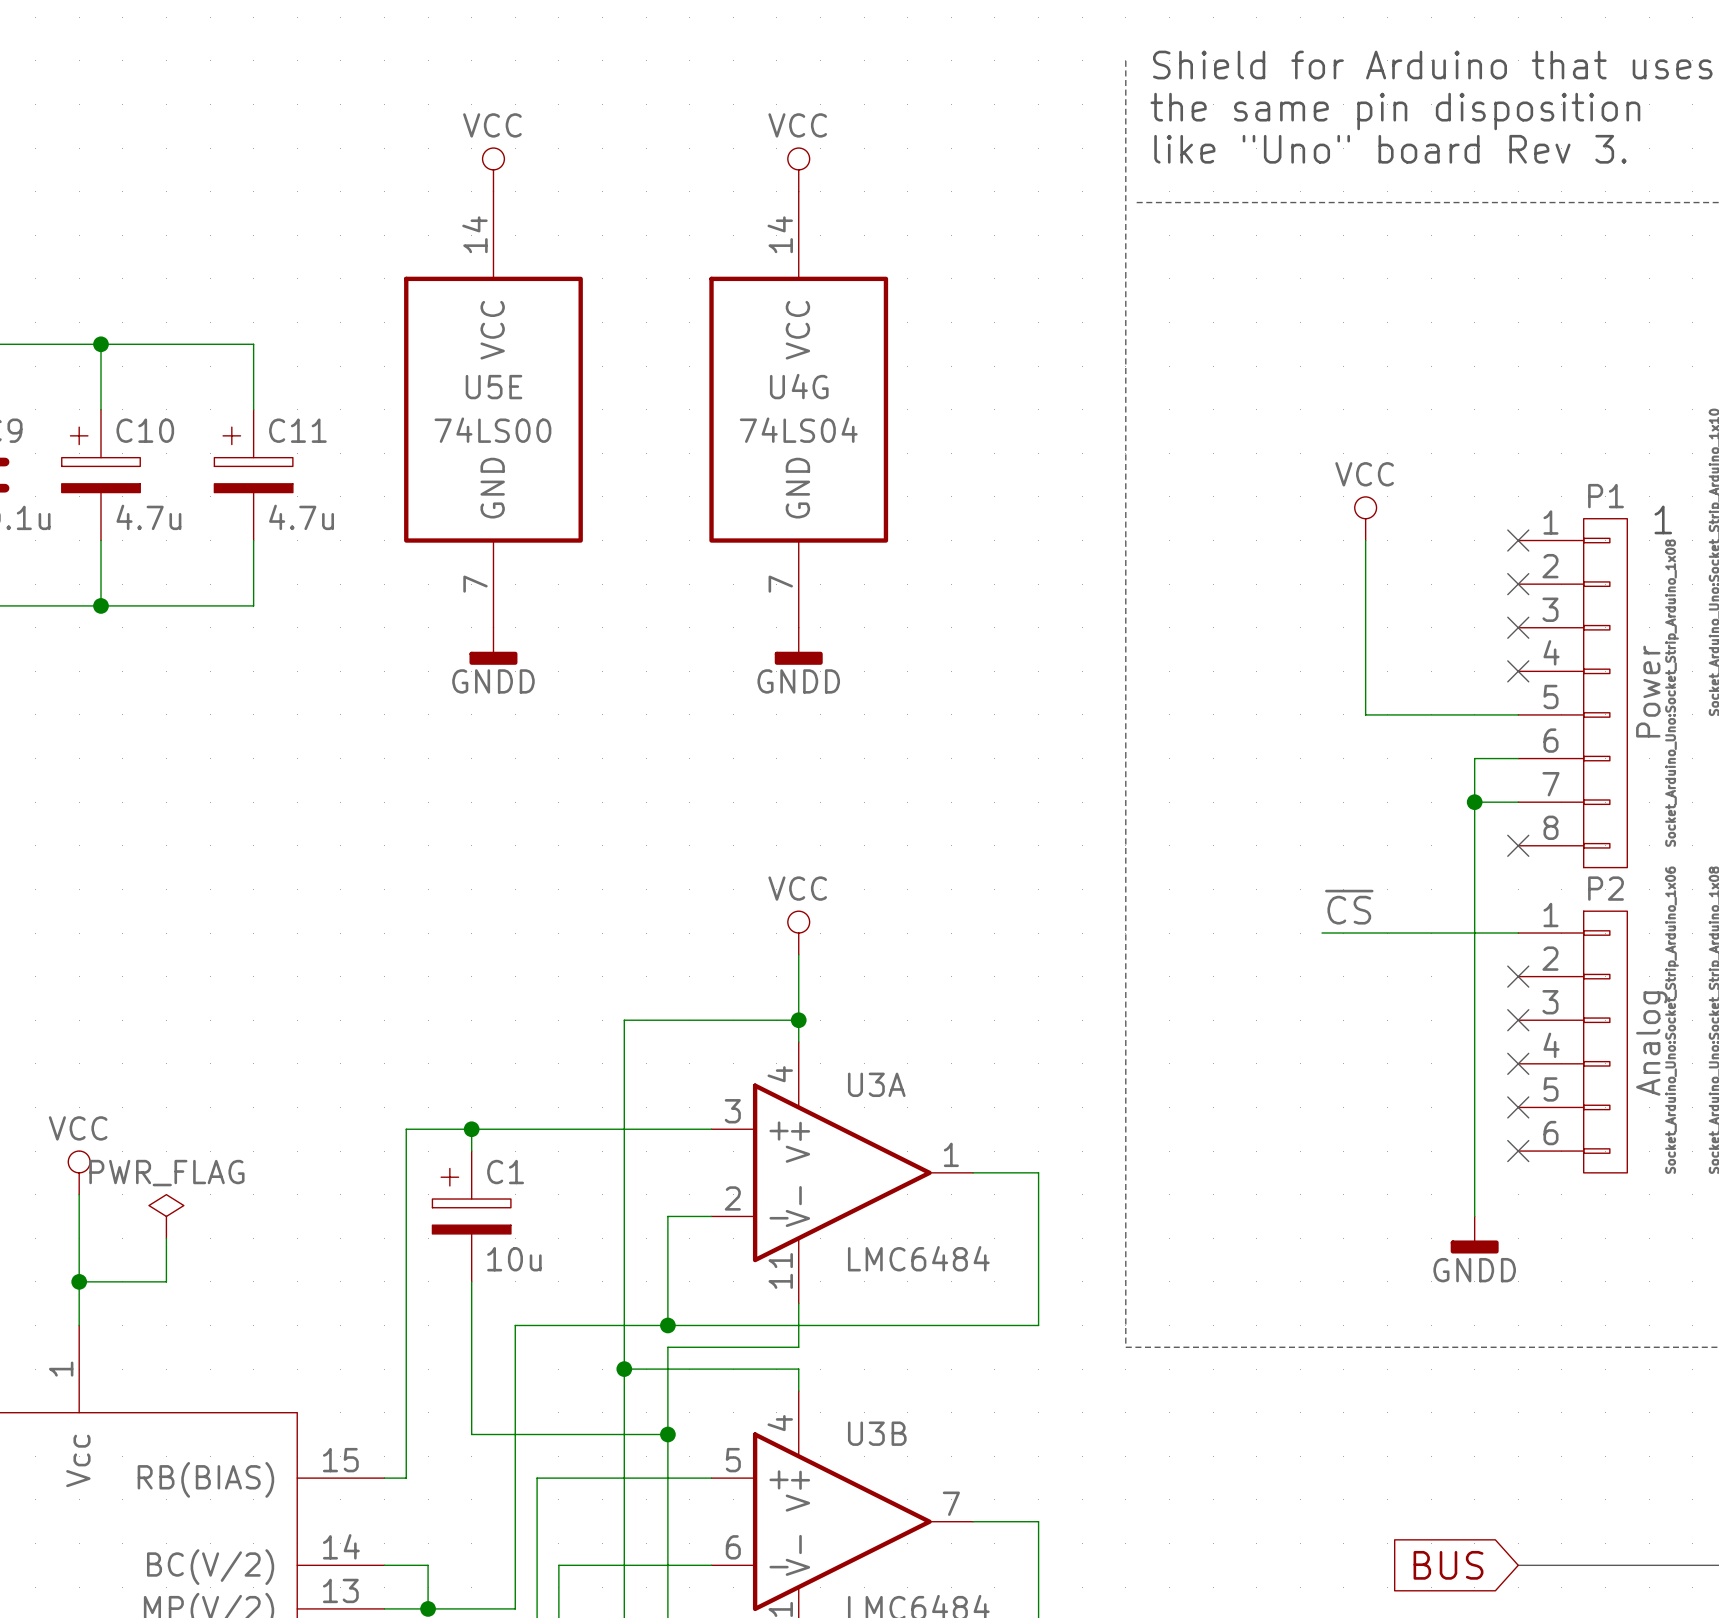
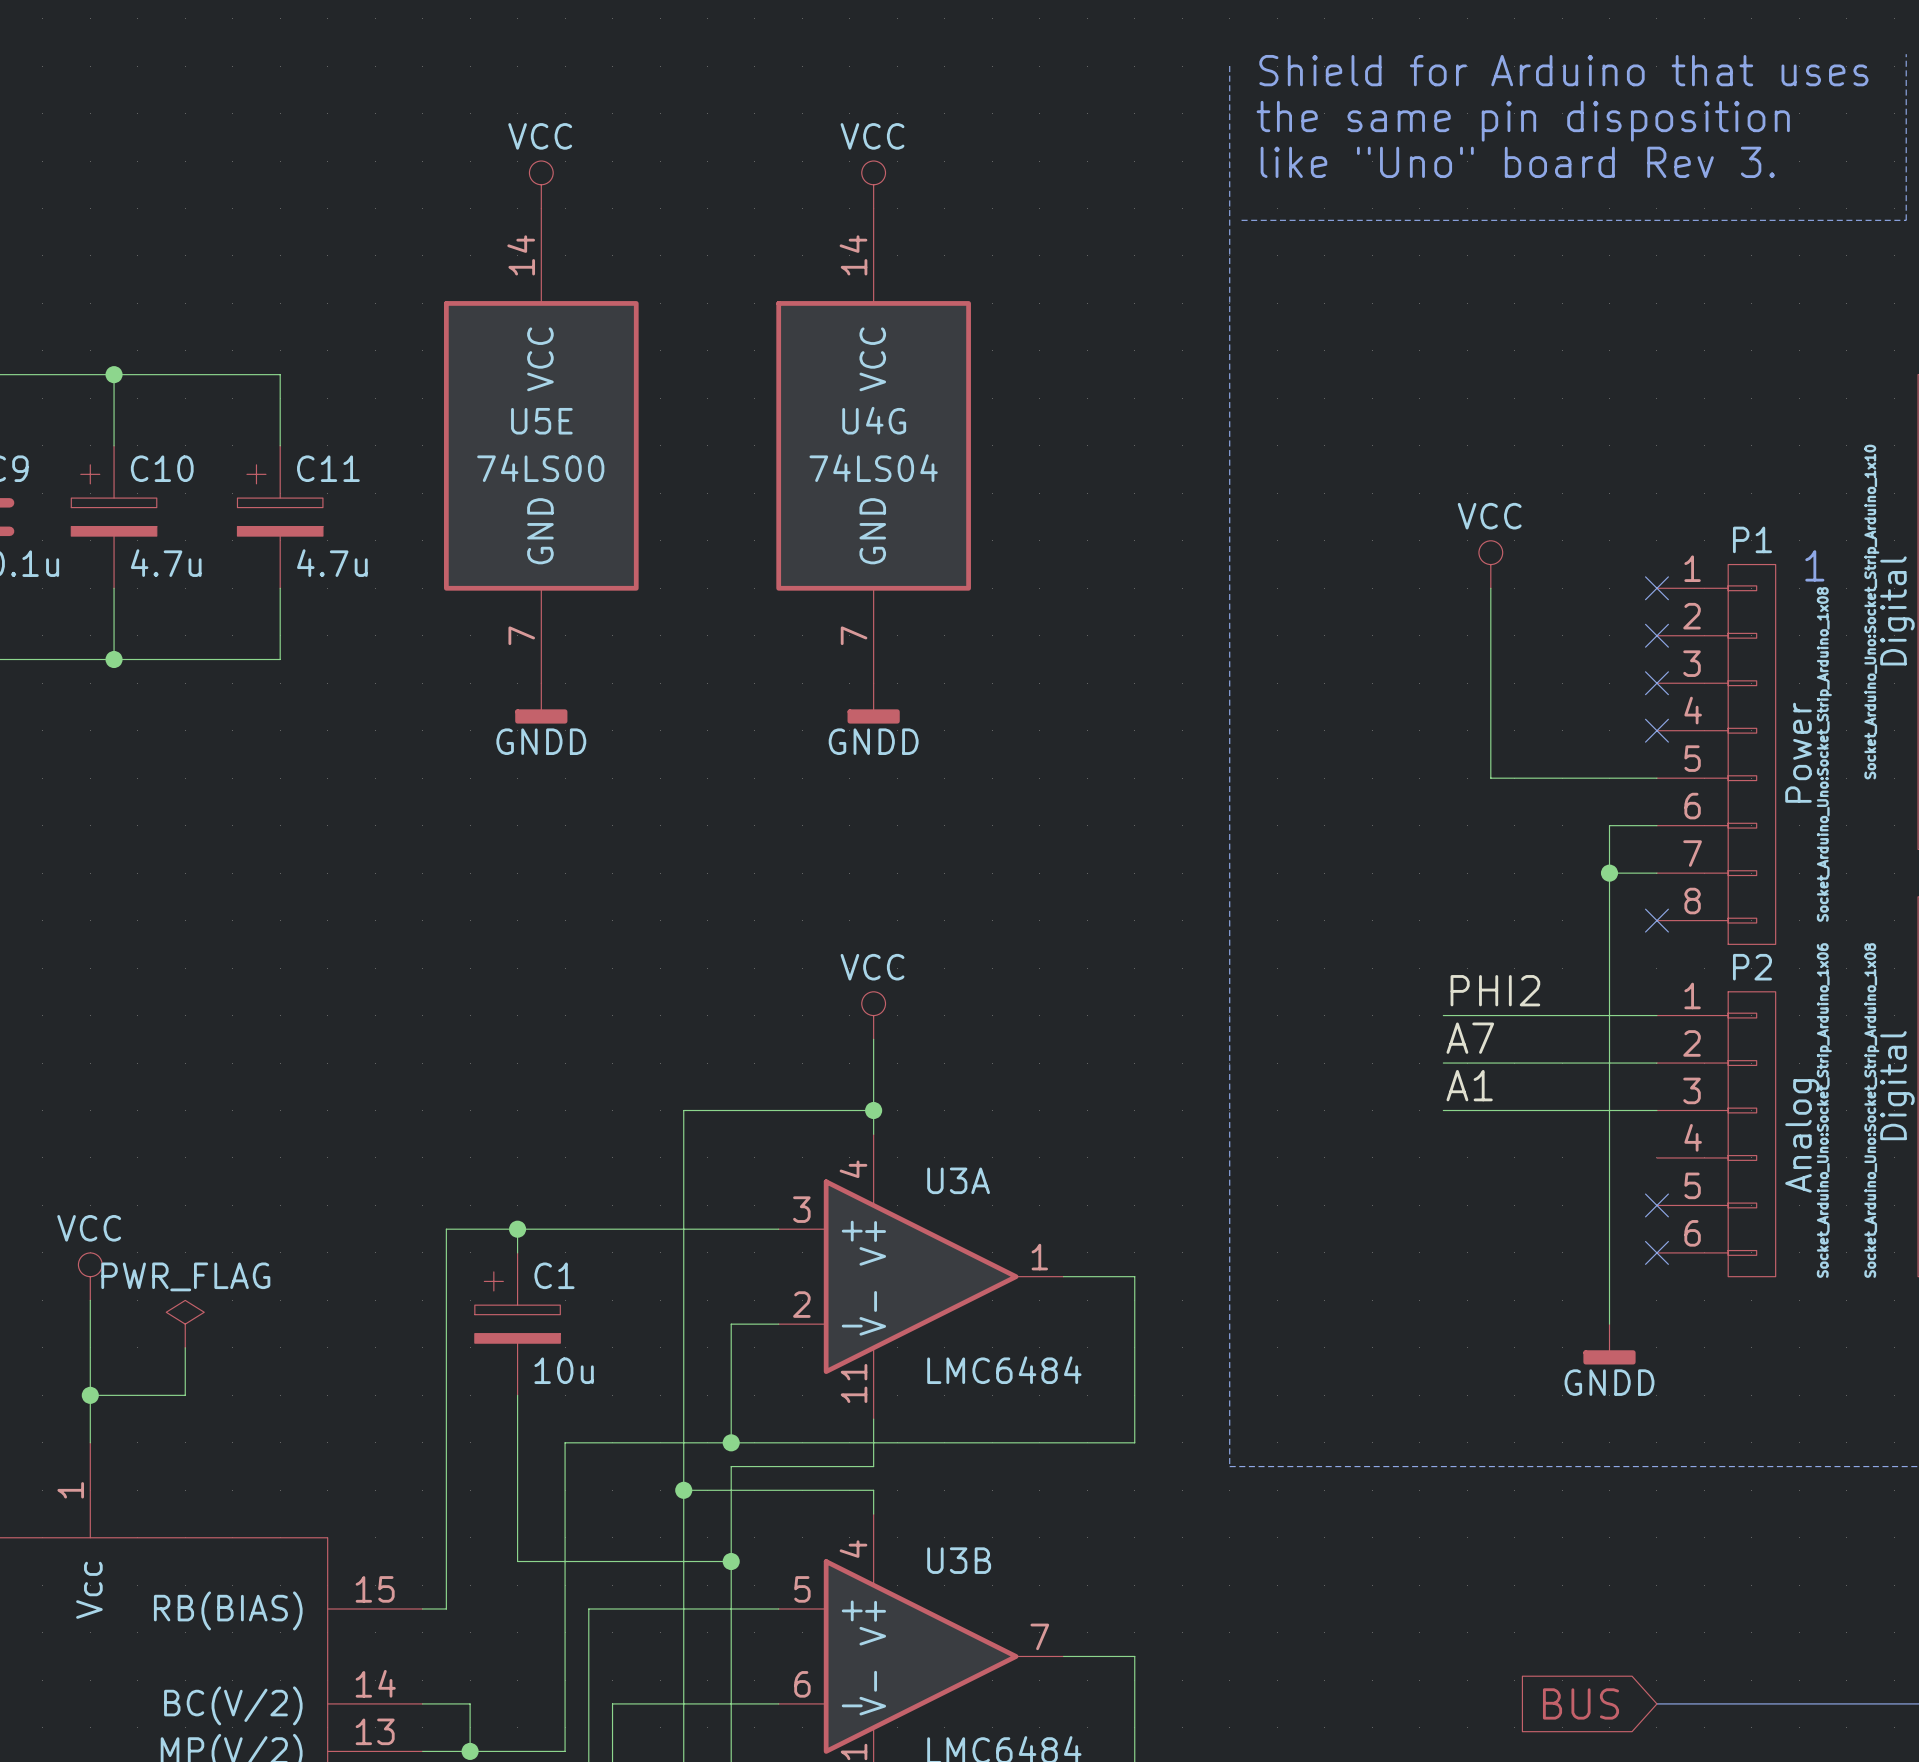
label: ~{CS} (1349, 907) -> PHI2 (1495, 990)
label: none -> A7 (1470, 1038)
wire: none -> (1443, 1063) (1656, 1063)
no-connect mark: (1518, 976) -> none
label: none -> A1 (1469, 1085)
wire: none -> (1443, 1110) (1656, 1110)
no-connect mark: (1518, 1020) -> none
no-connect mark: (1518, 1063) -> none

